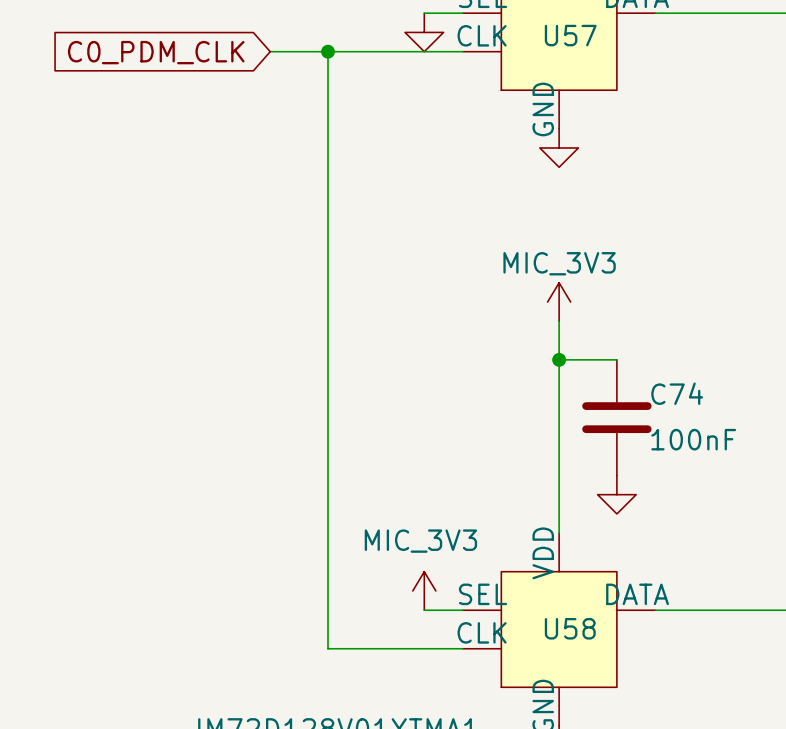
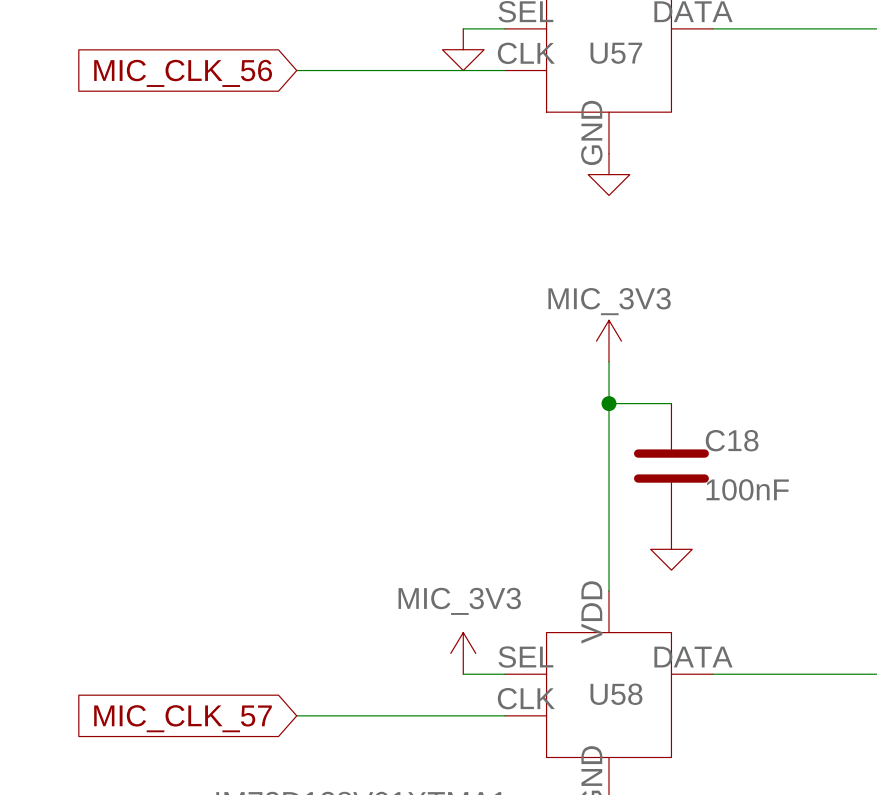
wire: (327, 51) (327, 648) -> (296, 715) (359, 715)
junction: (327, 51) -> none
global label: C0_PDM_CLK (156, 52) -> MIC_CLK_56 (183, 73)
C74 name: C74 (677, 393) -> C18 (732, 440)
global label: none -> MIC_CLK_57 (182, 718)

